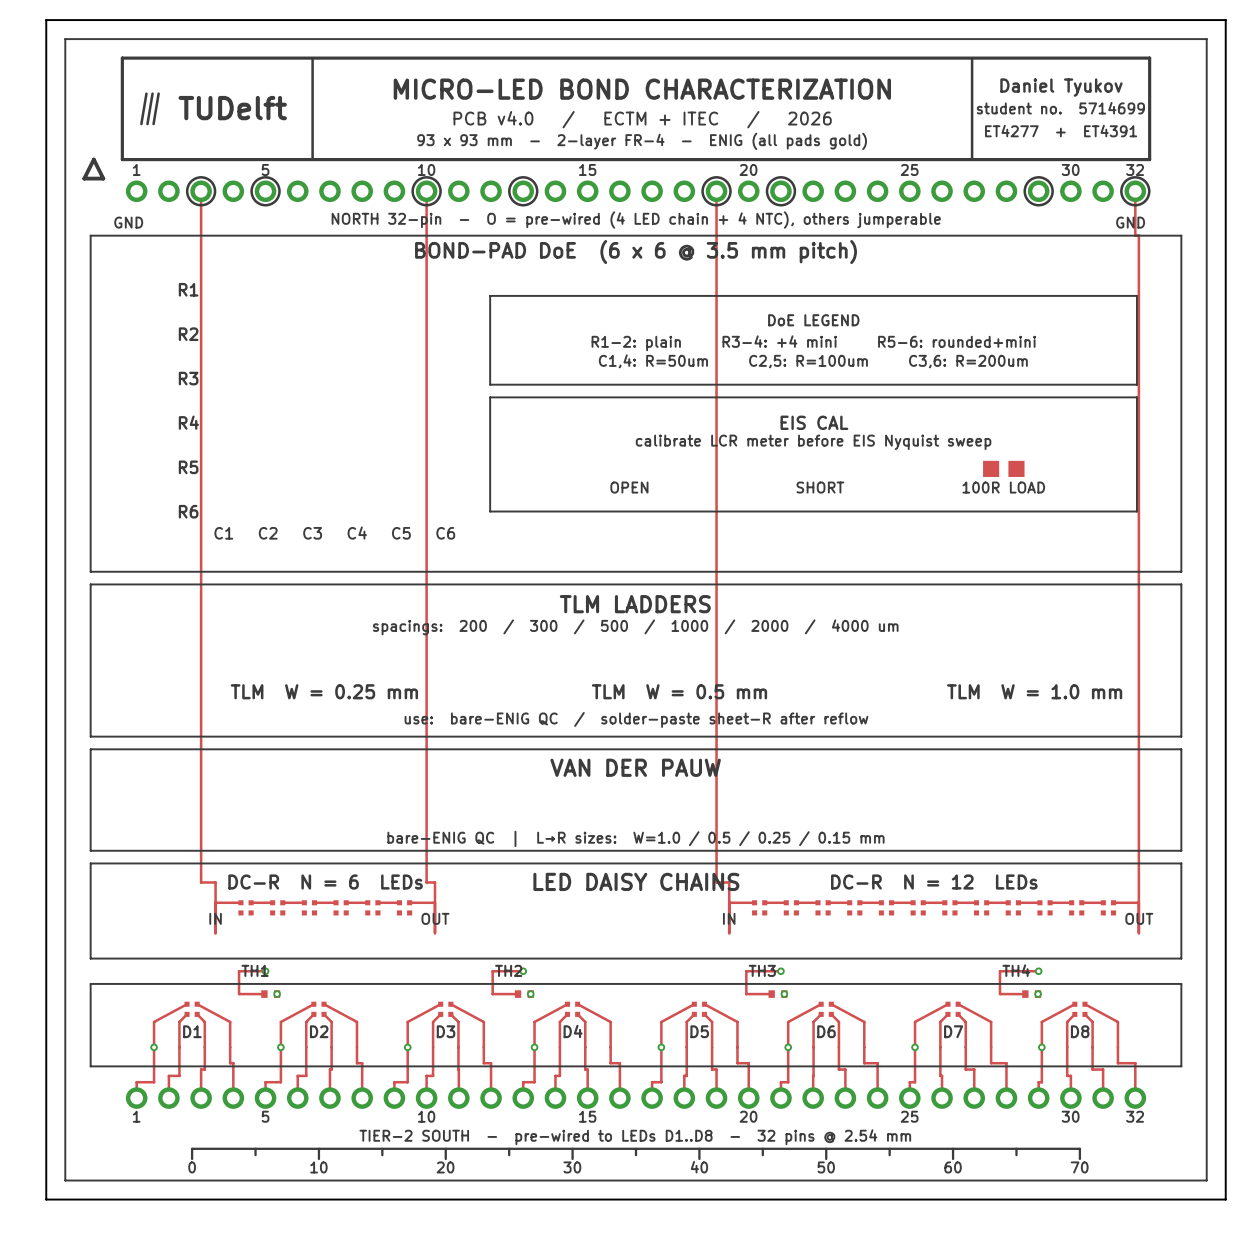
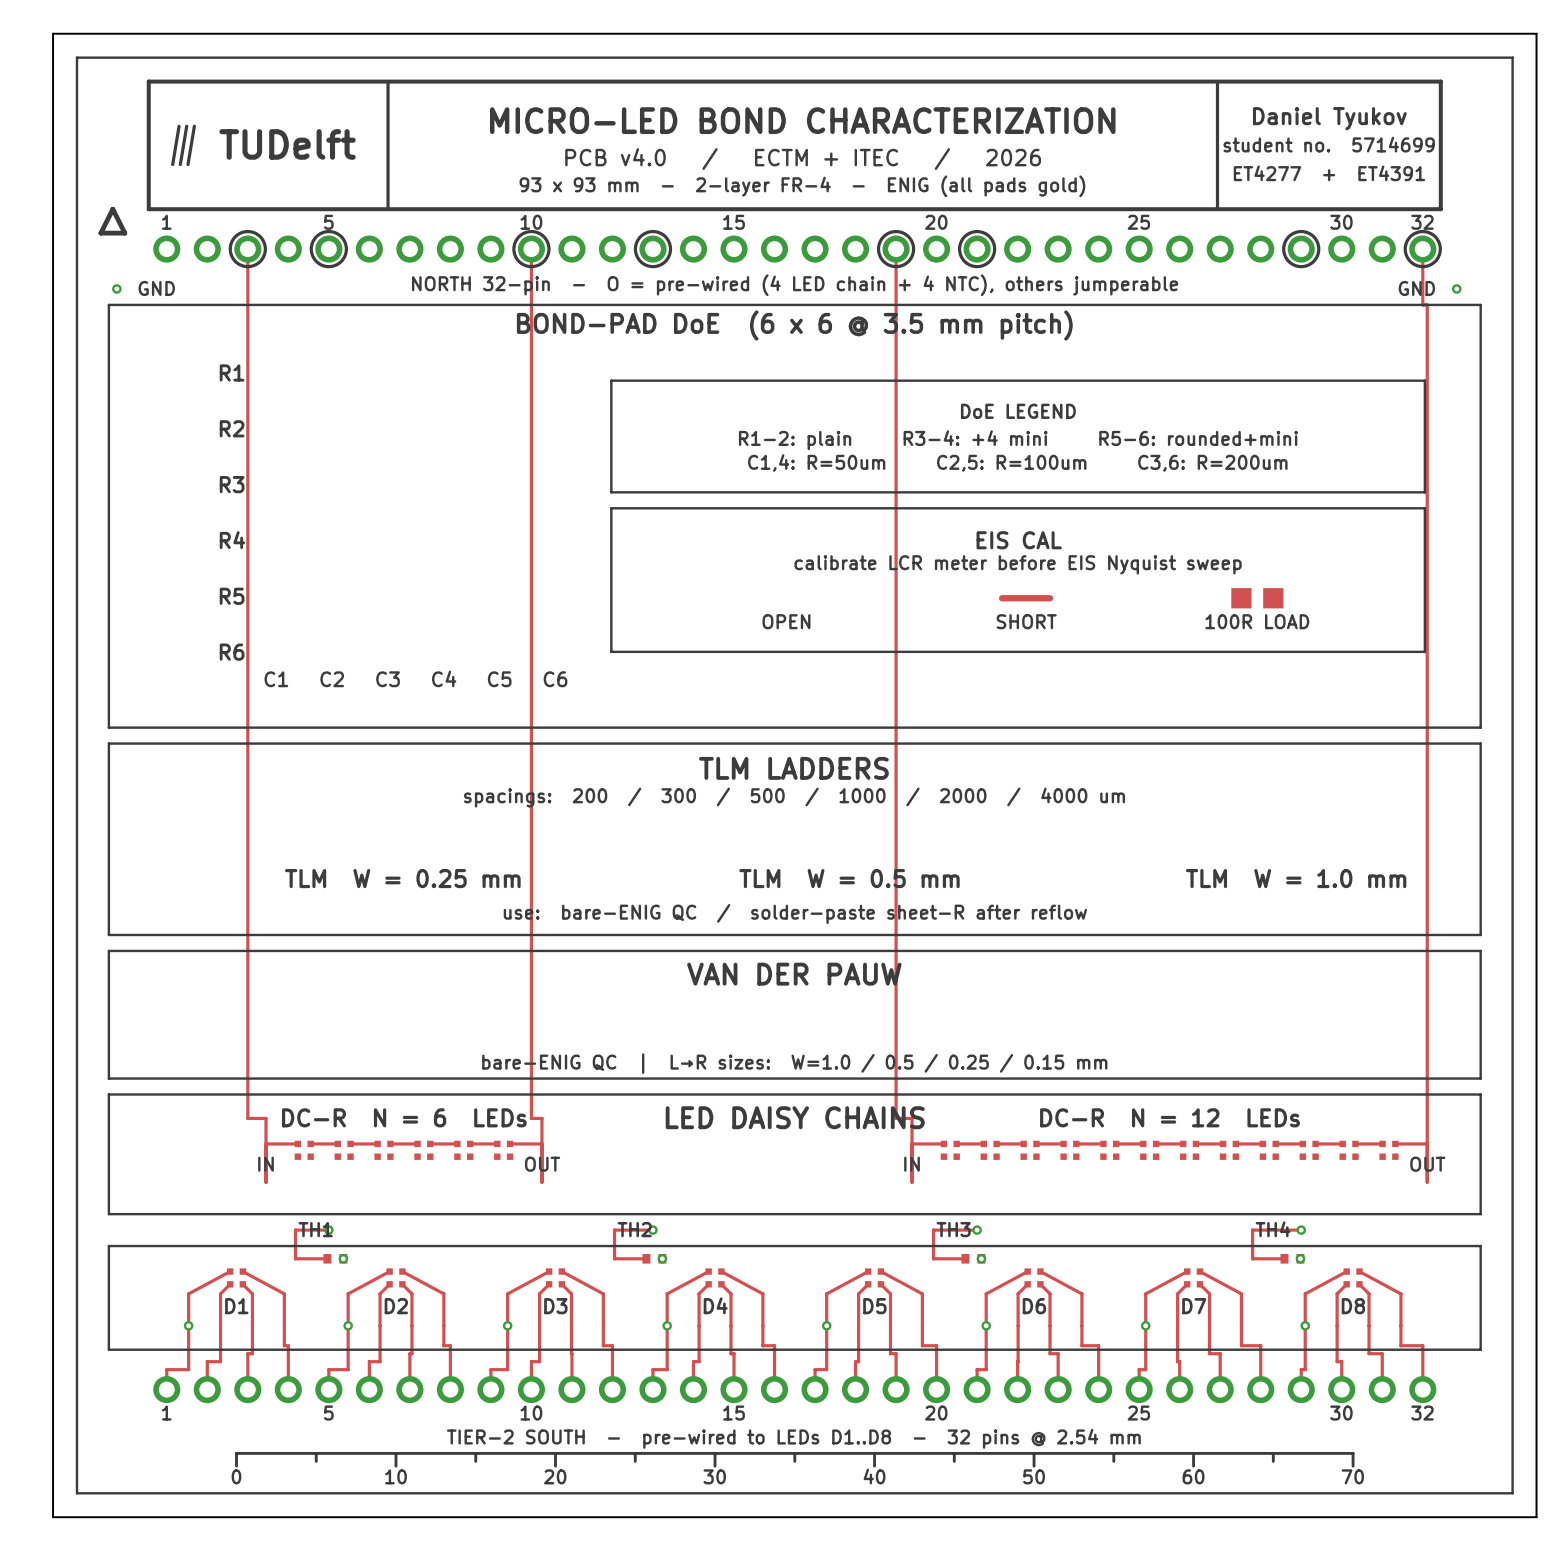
via: none -> (116, 288)
via: none -> (1456, 288)
track: none -> (1002, 598) (1050, 598)

